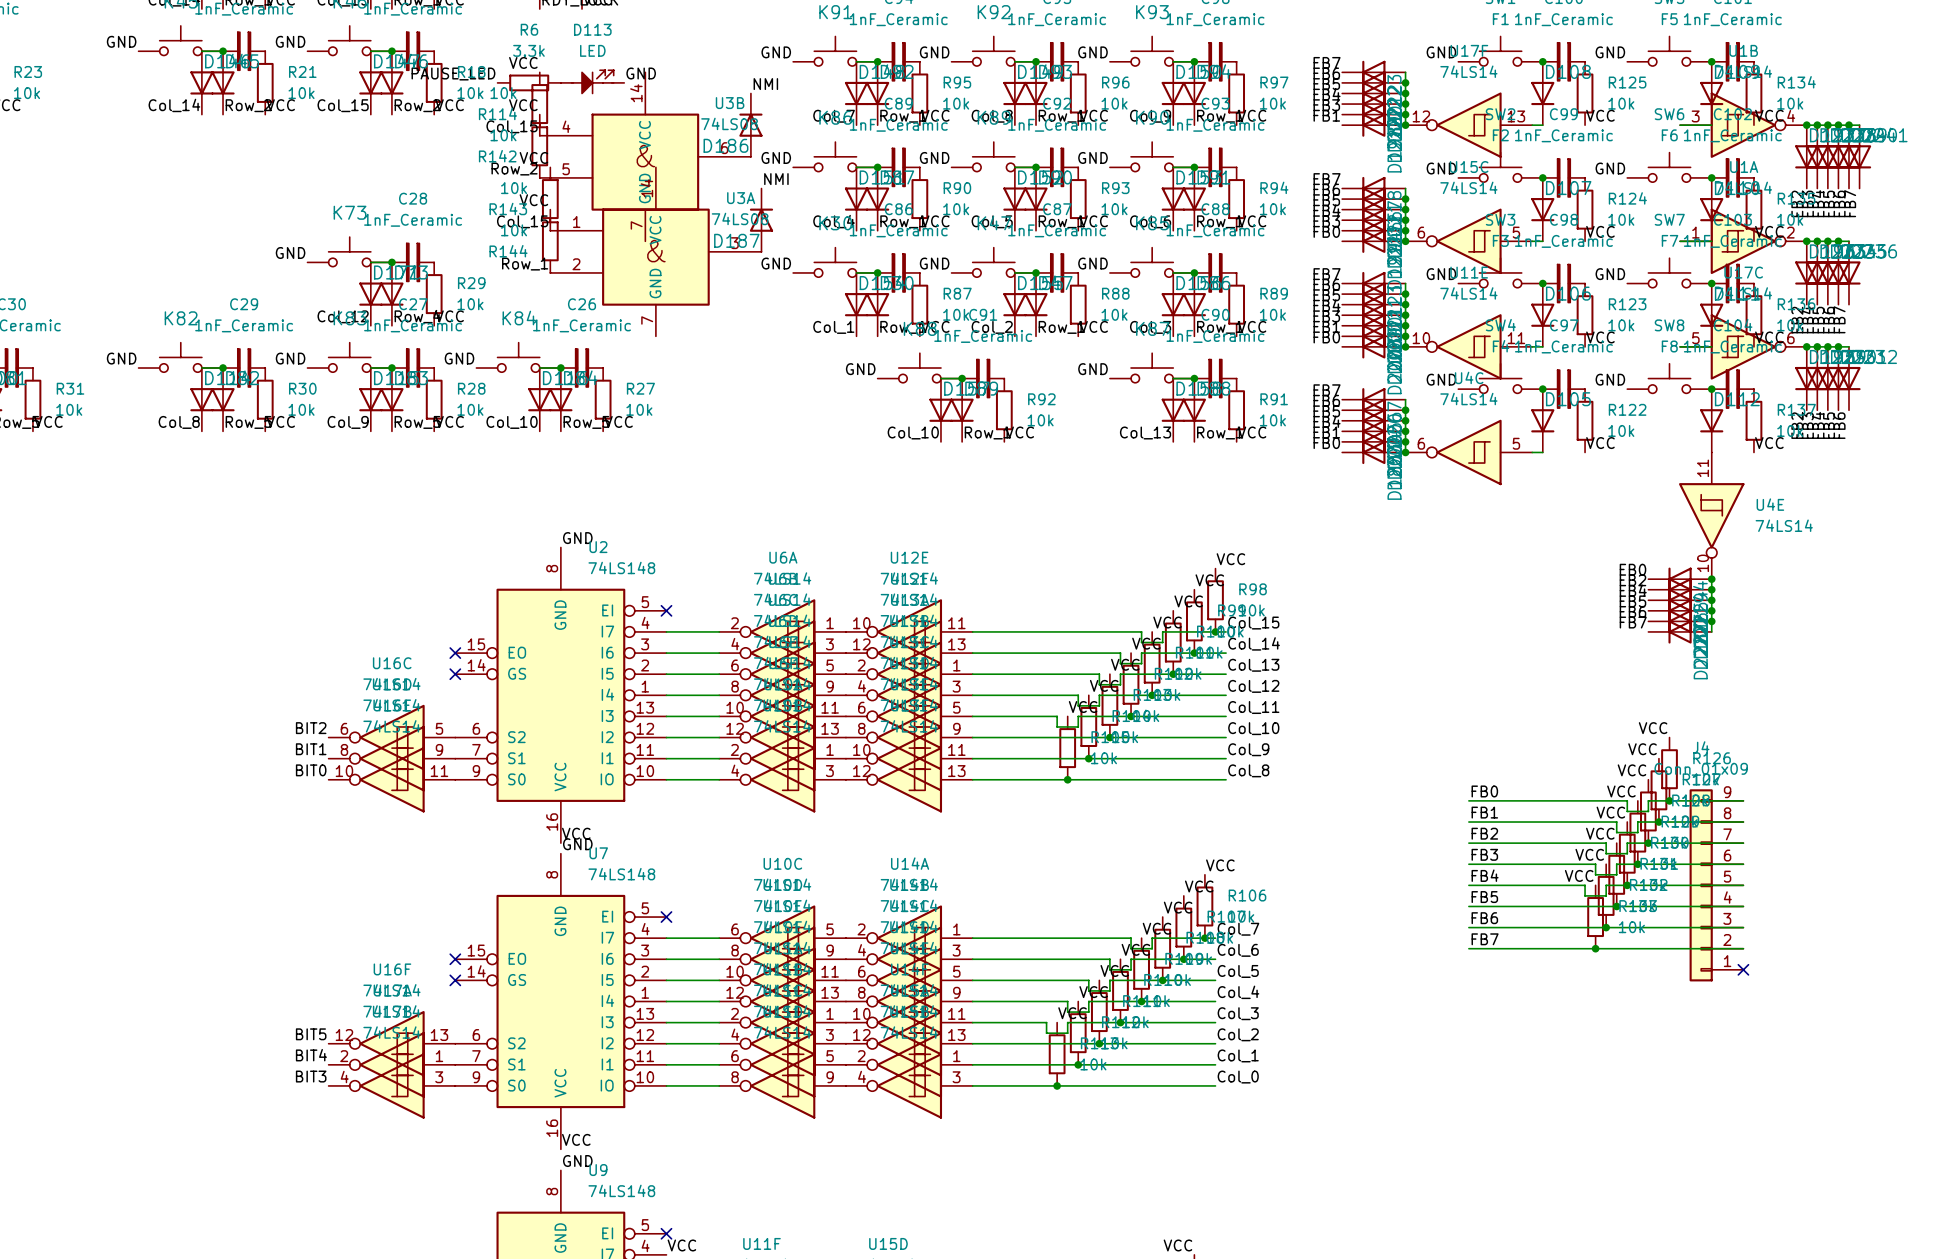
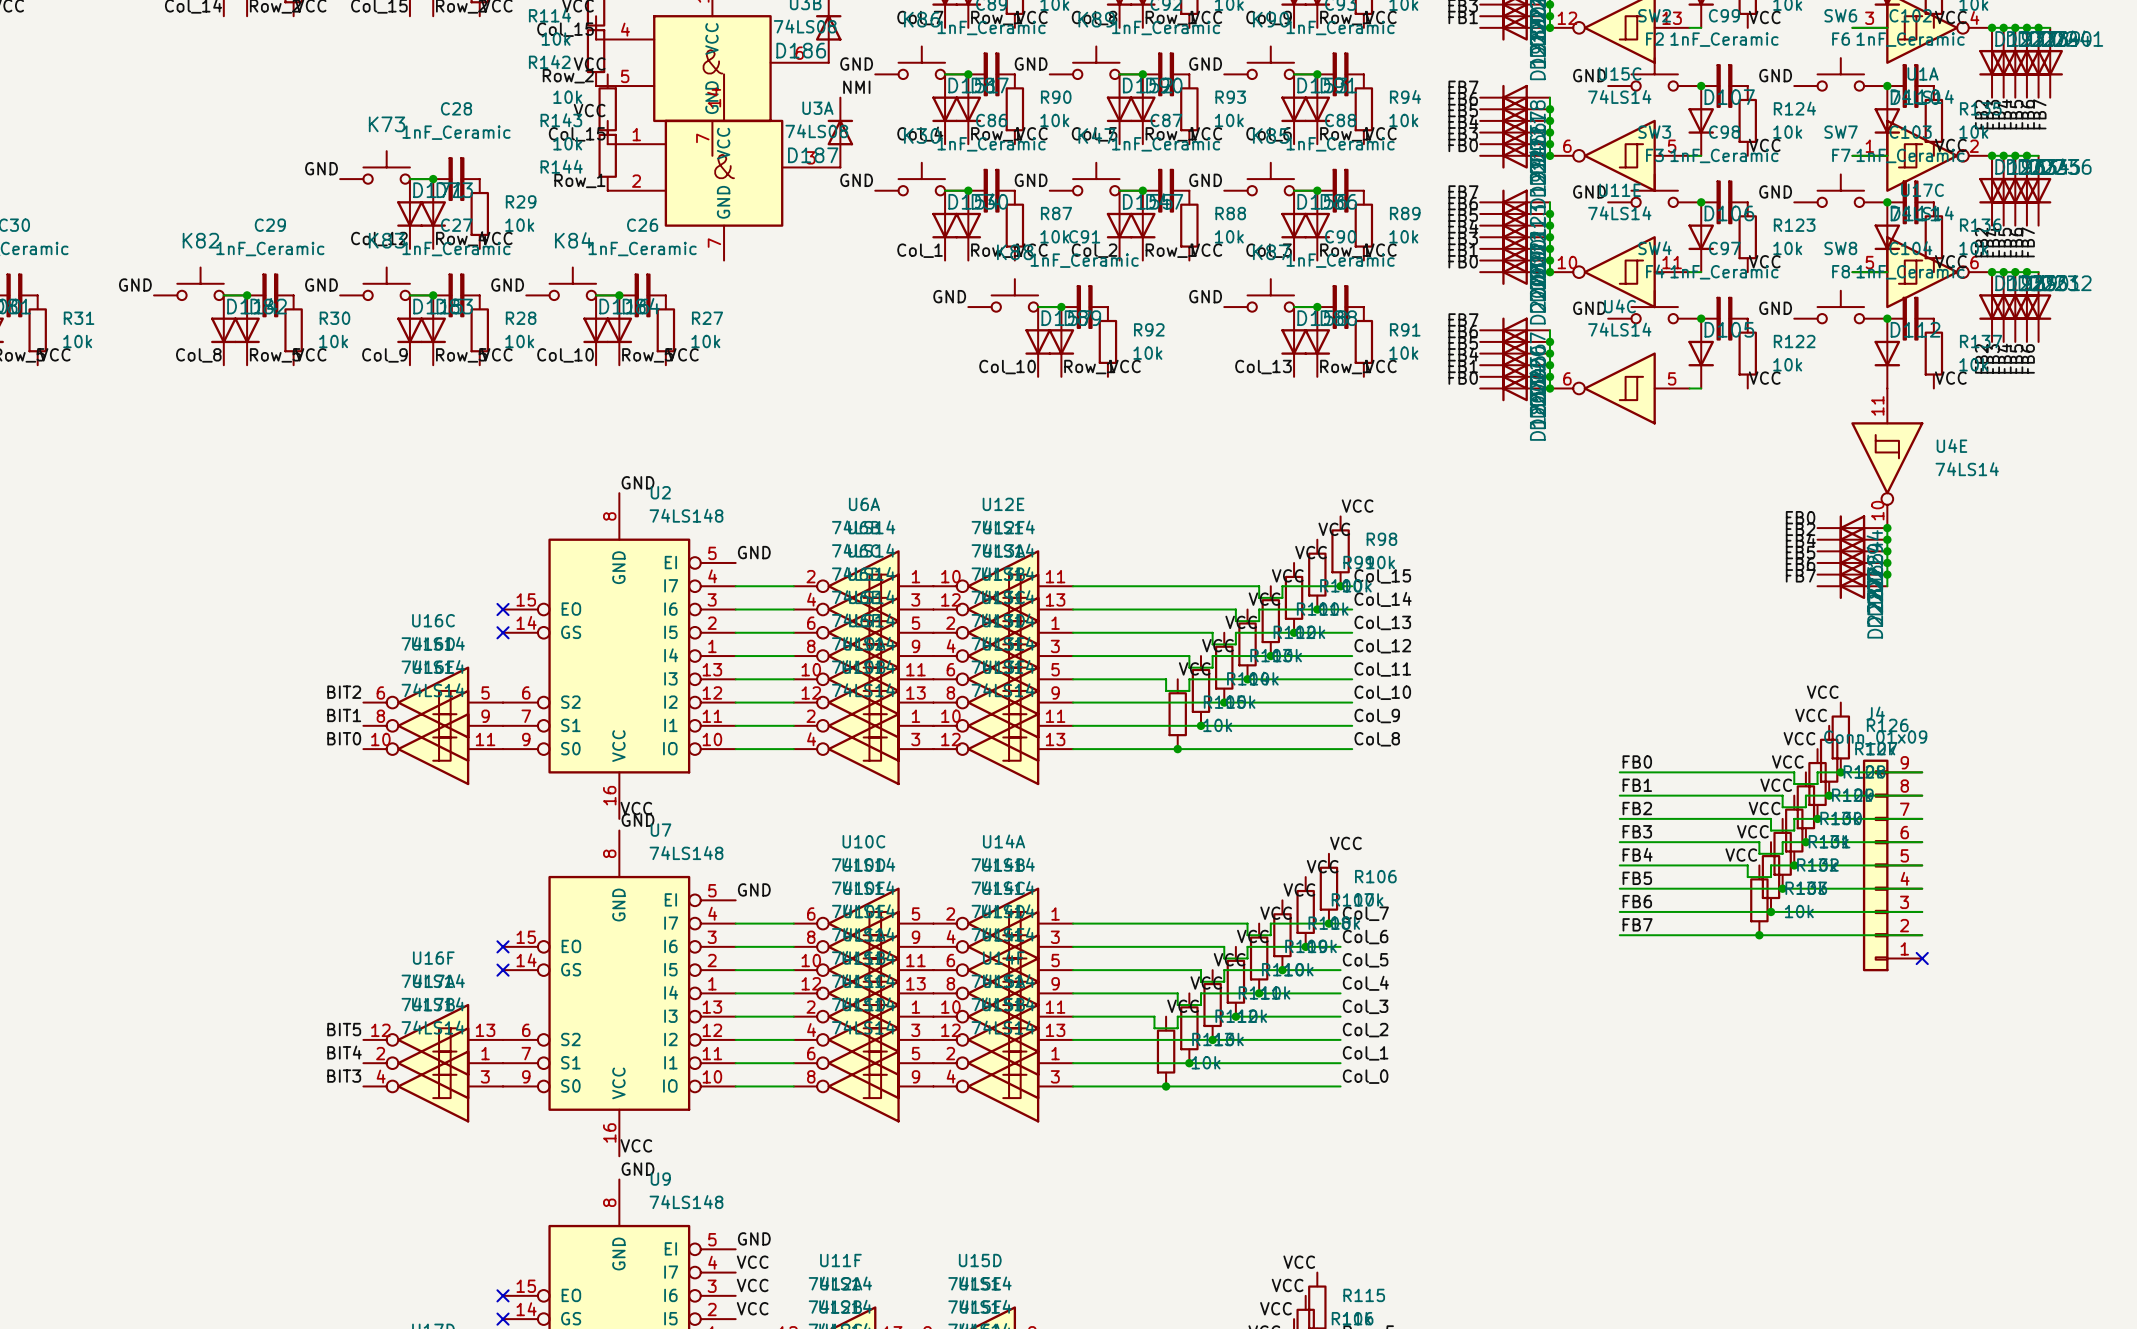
label: none -> GND (754, 552)
no-connect mark: (666, 610) -> none
label: none -> GND (754, 889)
no-connect mark: (666, 917) -> none
label: none -> GND (754, 1238)
no-connect mark: (666, 1233) -> none

